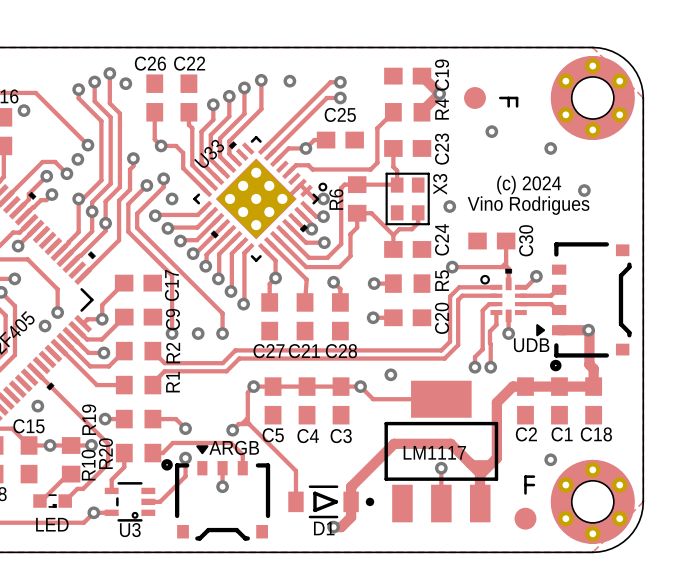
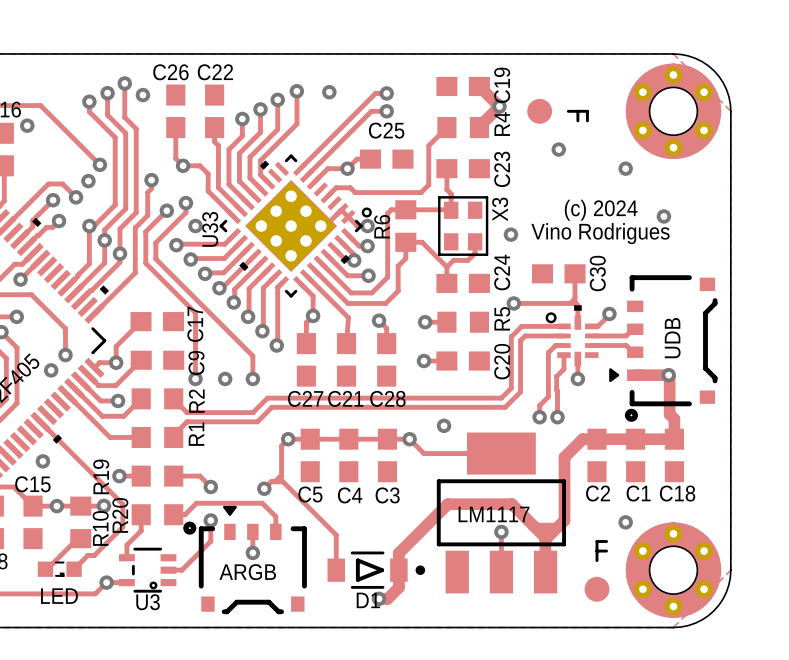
U33 name rotation: 0° (209, 153) -> 45° counterclockwise (210, 229)
U33 name position: U33 (209, 153) -> U33 (210, 229)
UDB name rotation: 0° (531, 345) -> 90° counterclockwise (672, 338)
UDB name position: UDB (531, 345) -> UDB (672, 338)
ARGB name position: ARGB (234, 447) -> ARGB (247, 572)

